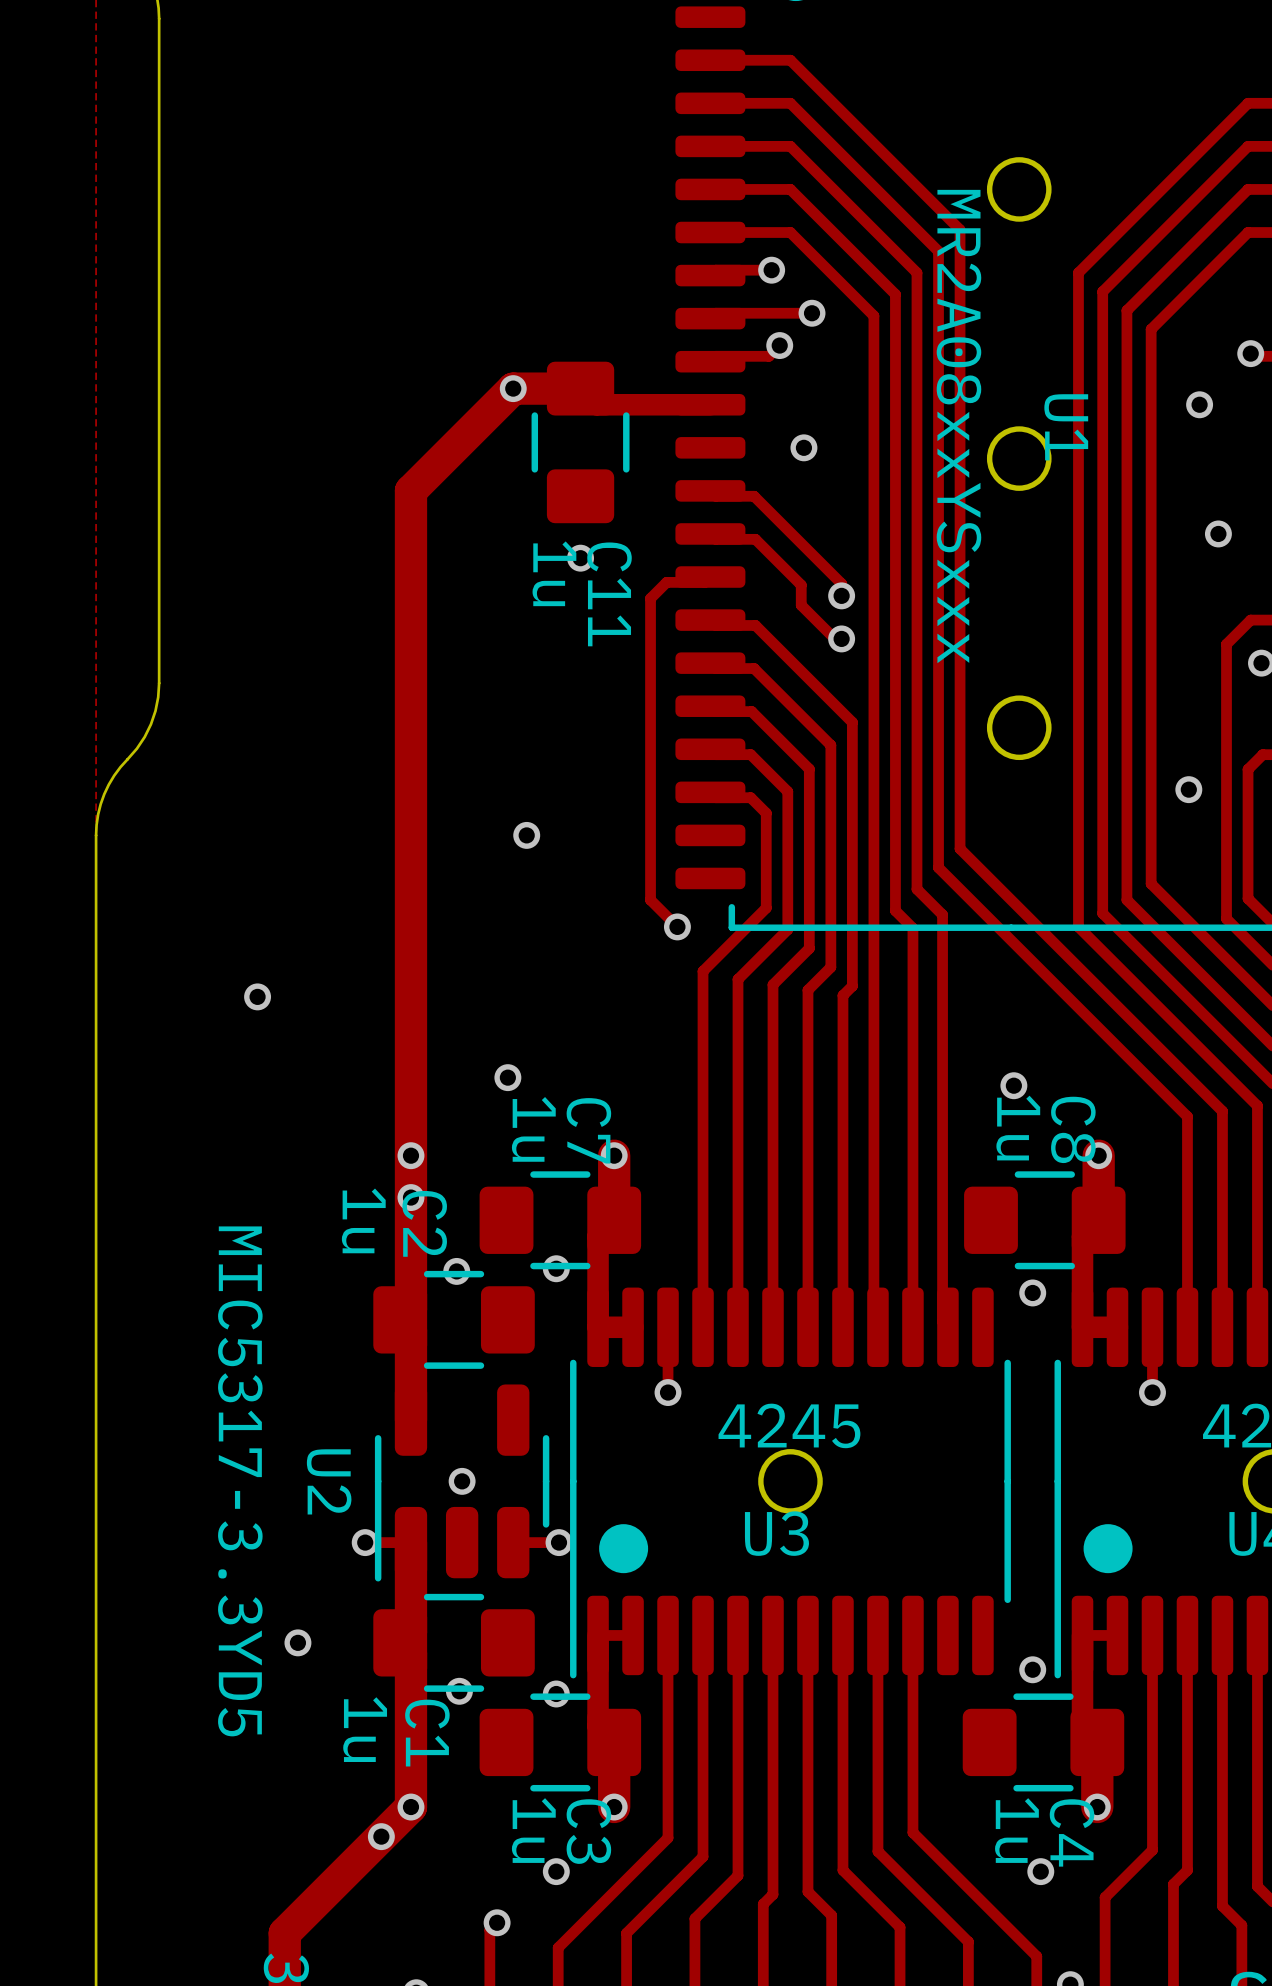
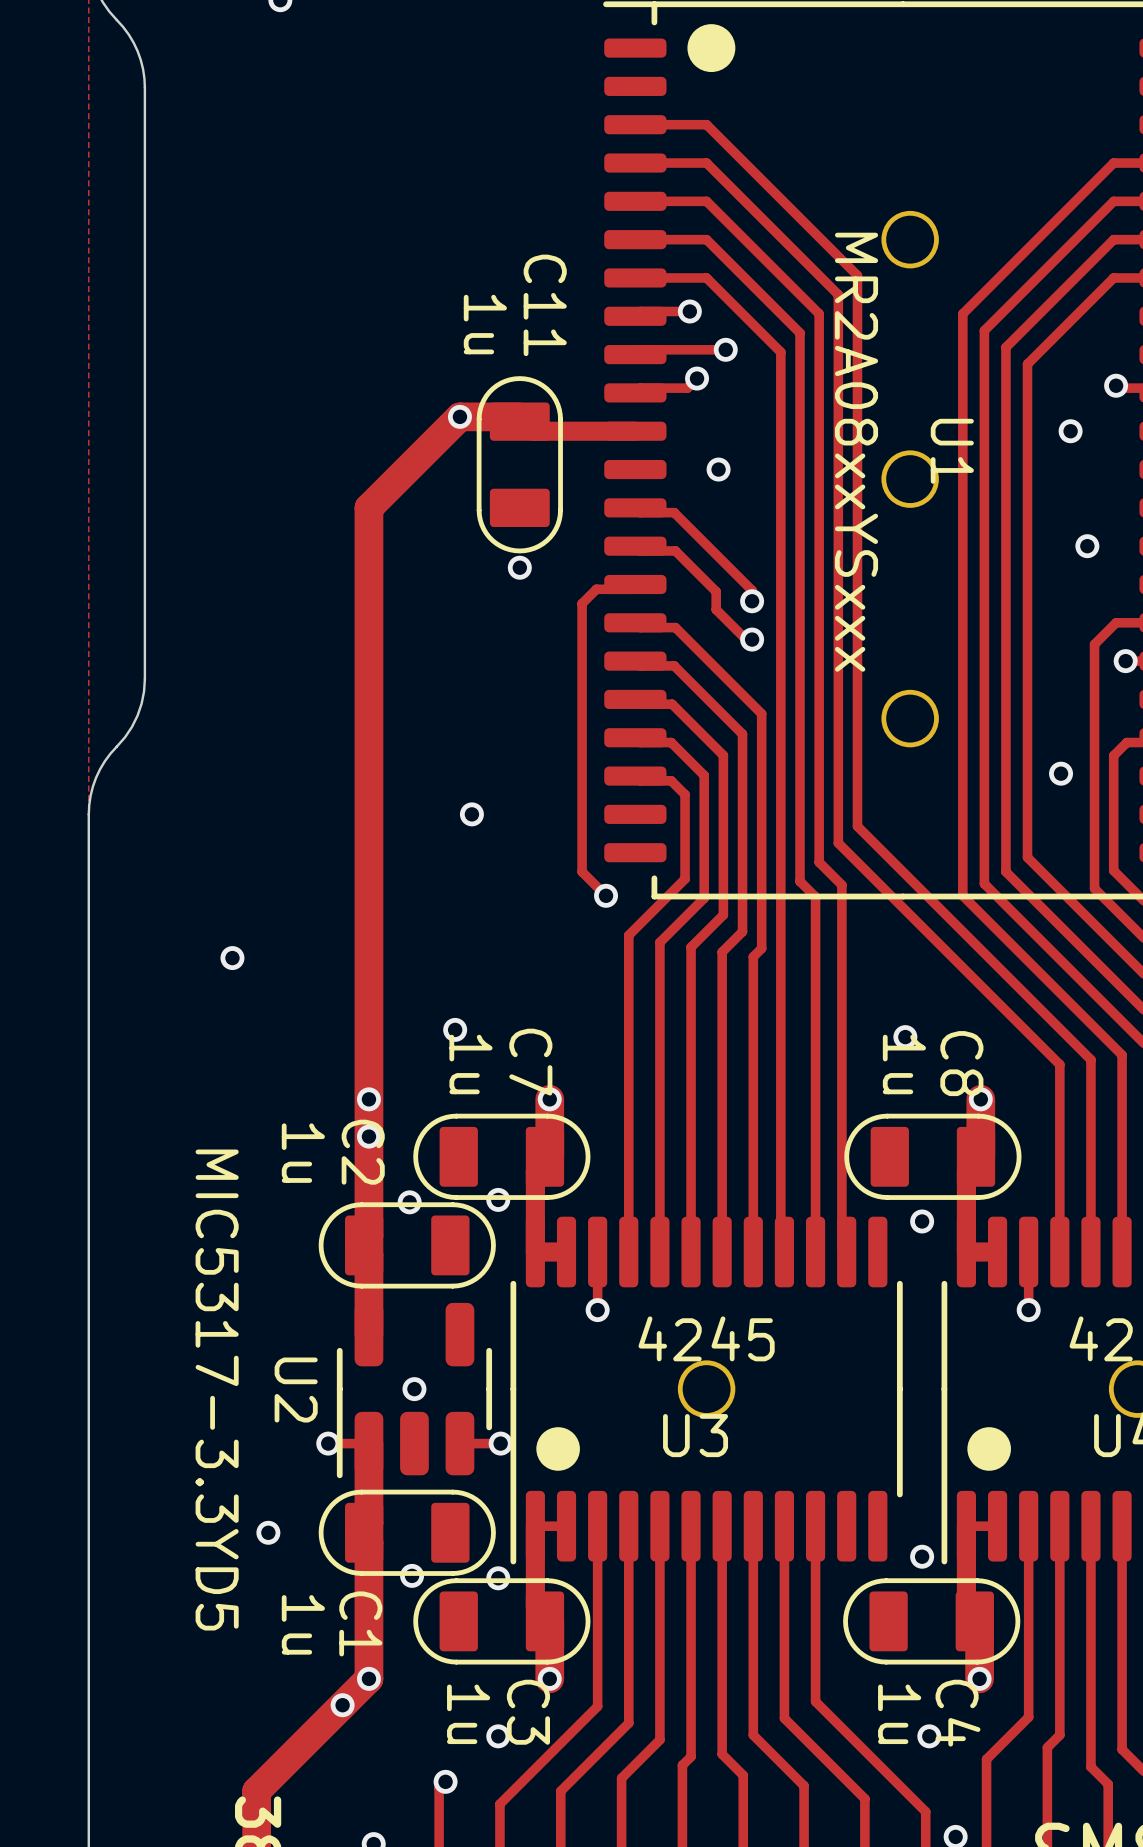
C11 footprint: [531, 361, 630, 524] -> [476, 376, 563, 554]
C11 value position: 1u (554, 573) -> 1u (485, 324)
C11 name position: C11 (609, 594) -> C11 (545, 305)
C7 footprint: [479, 1171, 642, 1270] -> [413, 1113, 591, 1200]
C8 footprint: [964, 1171, 1126, 1270] -> [844, 1113, 1022, 1200]
C2 footprint: [373, 1270, 535, 1369] -> [318, 1202, 496, 1289]
C1 footprint: [373, 1593, 535, 1692] -> [318, 1489, 496, 1576]
C3 footprint: [479, 1693, 642, 1792] -> [413, 1578, 591, 1665]
C4 footprint: [962, 1693, 1125, 1792] -> [843, 1578, 1021, 1665]

